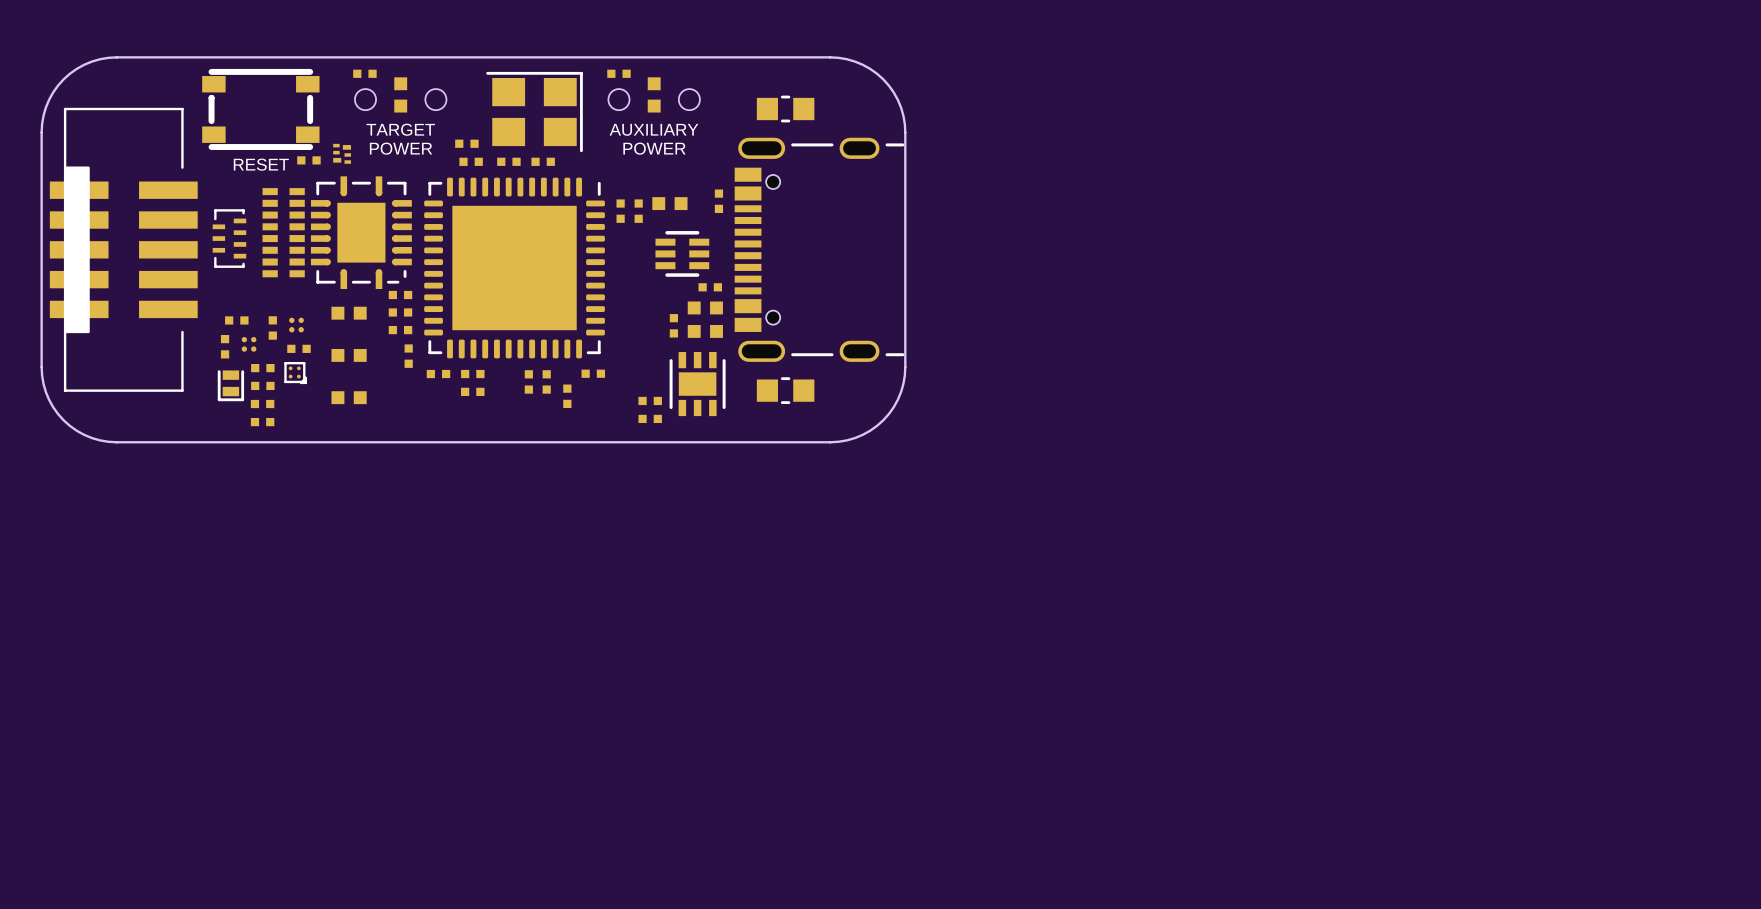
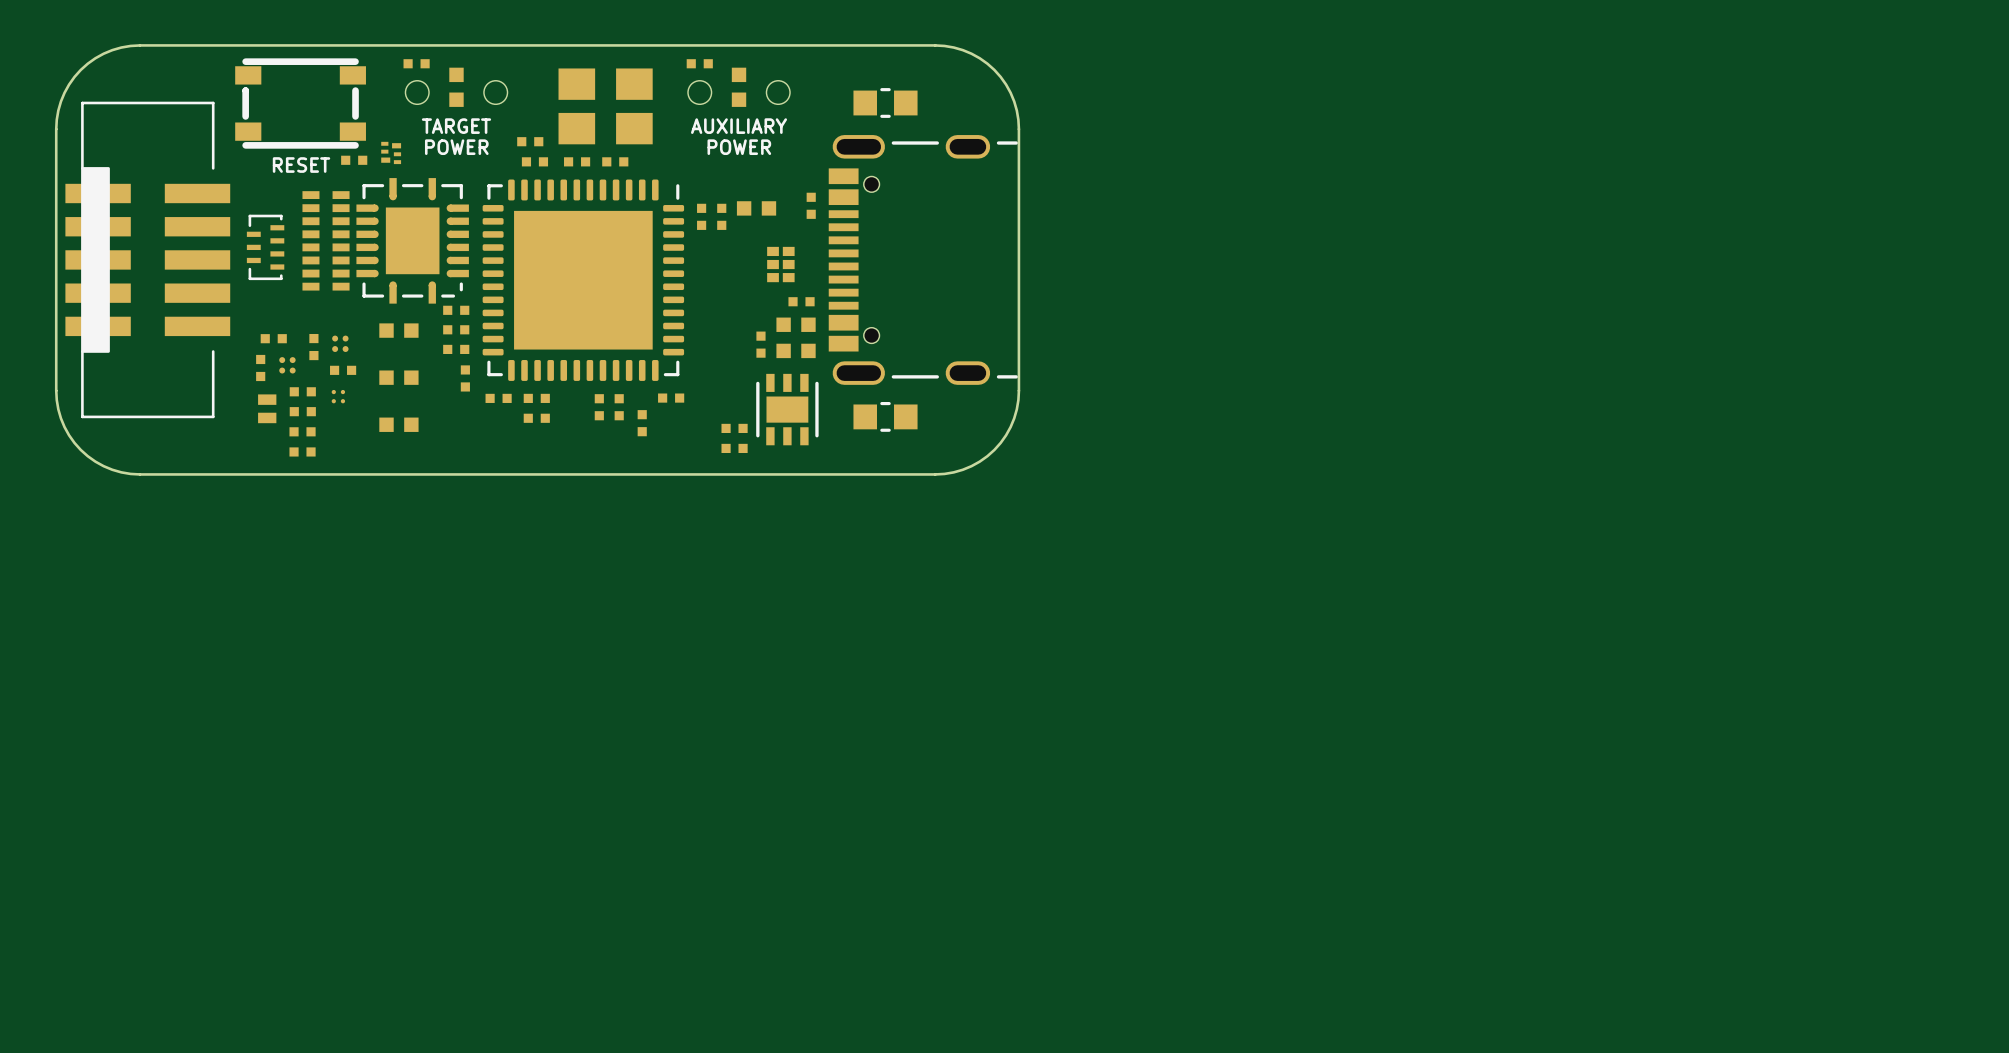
part footprint: [486, 71, 583, 153] -> [558, 68, 653, 145]
part footprint: [655, 231, 710, 280] -> [767, 246, 795, 283]
part footprint: [284, 362, 307, 385] -> [331, 389, 346, 404]
part footprint: [217, 370, 245, 402] -> [258, 394, 277, 424]

